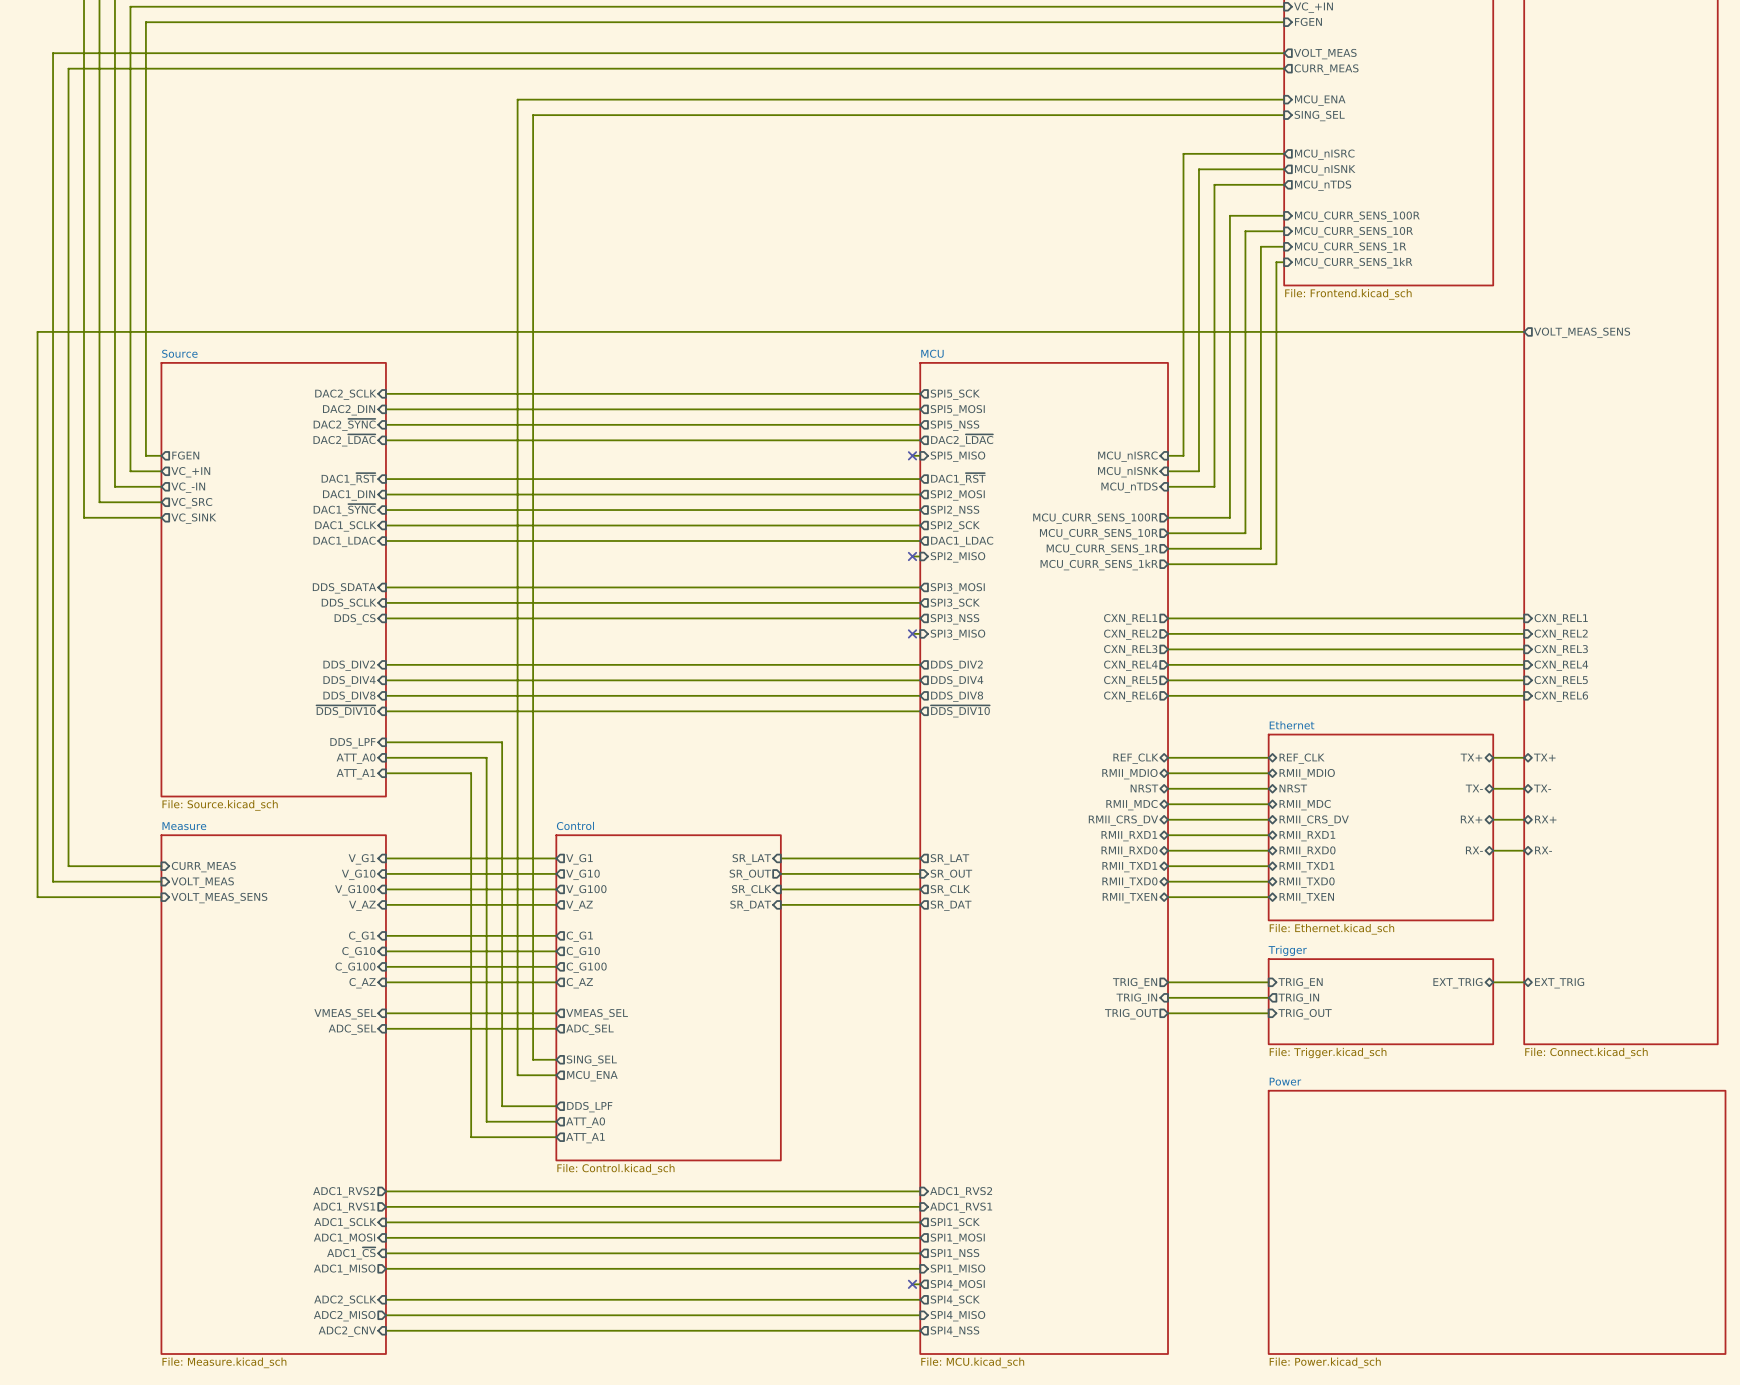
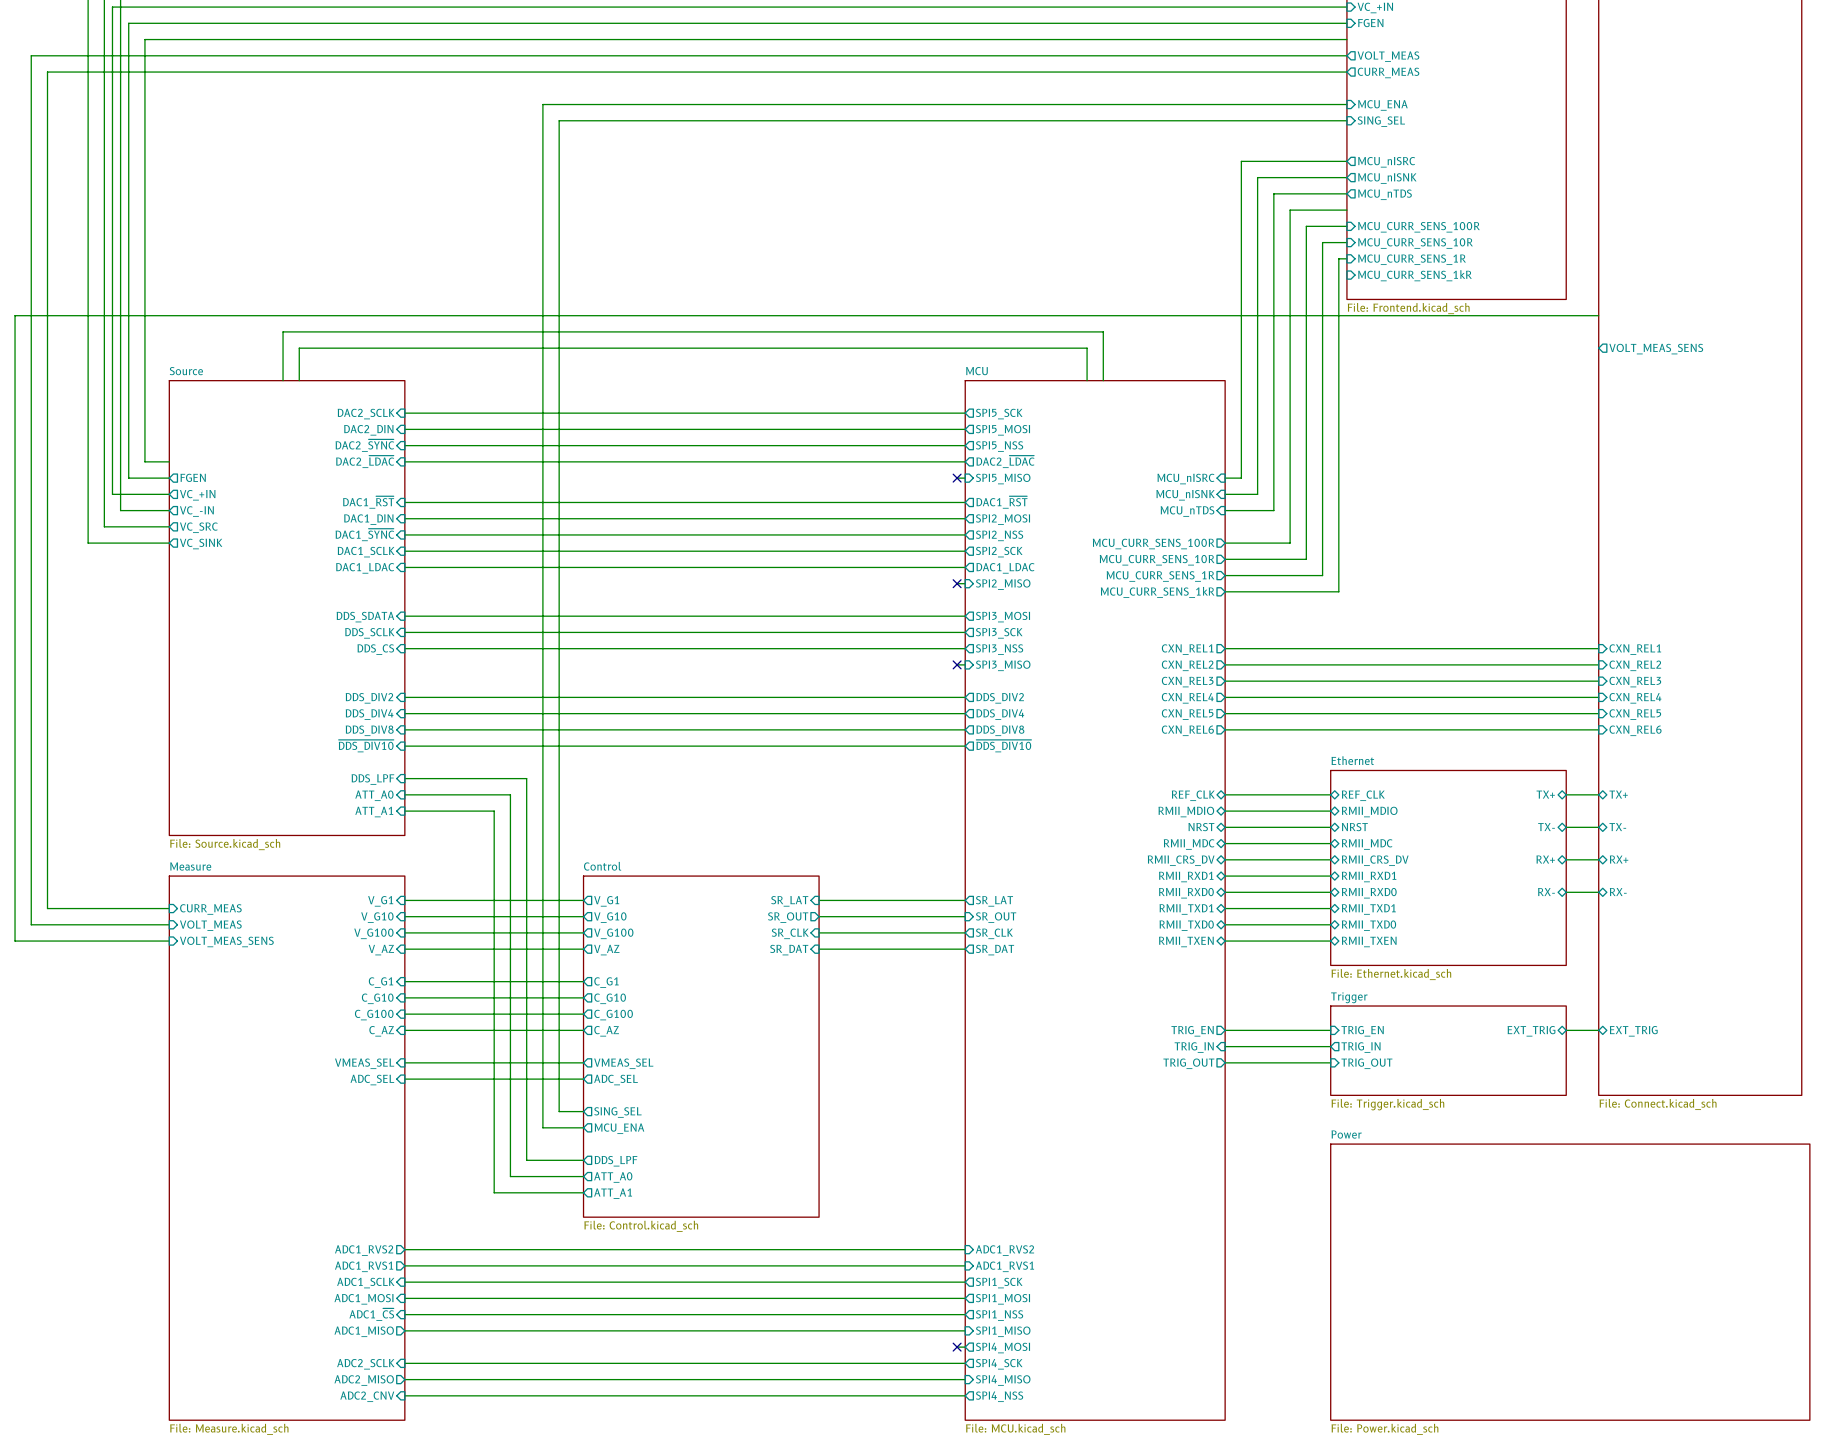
wire: (130, 6) (130, 471) -> (136, 7) (112, 7) (112, 494) (136, 494)
wire: (145, 22) (145, 455) -> (153, 23) (128, 23) (128, 478) (153, 478)
wire: none -> (1346, 39) (144, 39) (144, 461) (169, 461)
wire: (53, 53) (53, 881) -> (55, 55) (31, 55) (31, 924) (55, 924)
wire: (68, 68) (68, 866) -> (71, 72) (47, 72) (47, 908) (71, 908)
wire: (1229, 215) (1245, 215) -> (1290, 226) (1290, 210) (1346, 210)
wire: (1245, 231) (1260, 231) -> (1306, 242) (1306, 226)
wire: (1260, 246) (1276, 246) -> (1322, 258) (1322, 242)
wire: (1276, 262) (1284, 262) -> (1338, 275) (1338, 258)
wire: none -> (1598, 315) (15, 315) (15, 941) (39, 941)
wire: (285, 331) (37, 331) (37, 897) -> (299, 348) (299, 380)
wire: (1036, 331) (1524, 331) -> (1087, 348) (1087, 380)
wire: none -> (283, 380) (283, 331) (1103, 331) (1103, 380)

